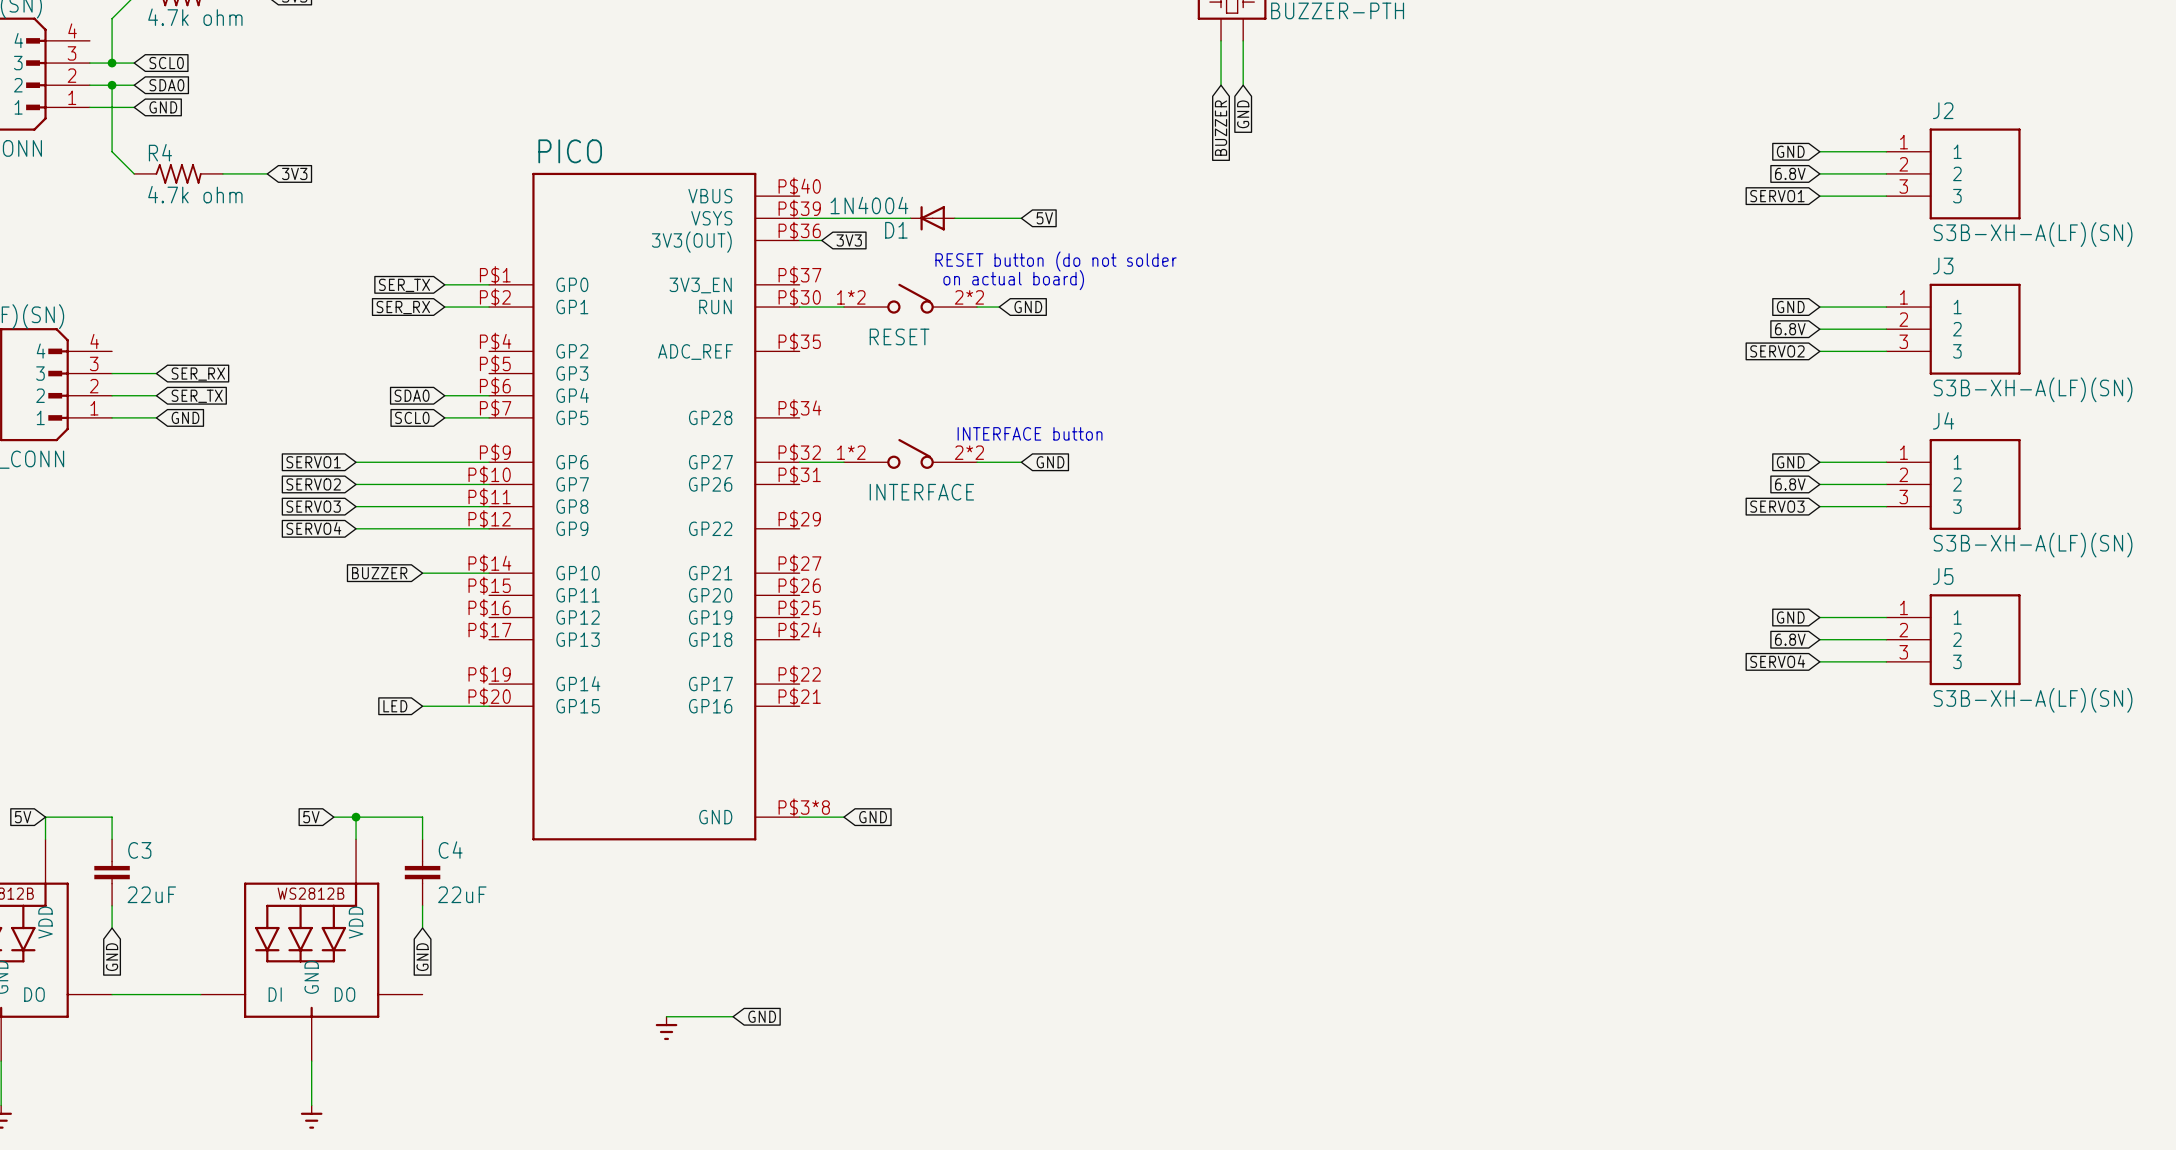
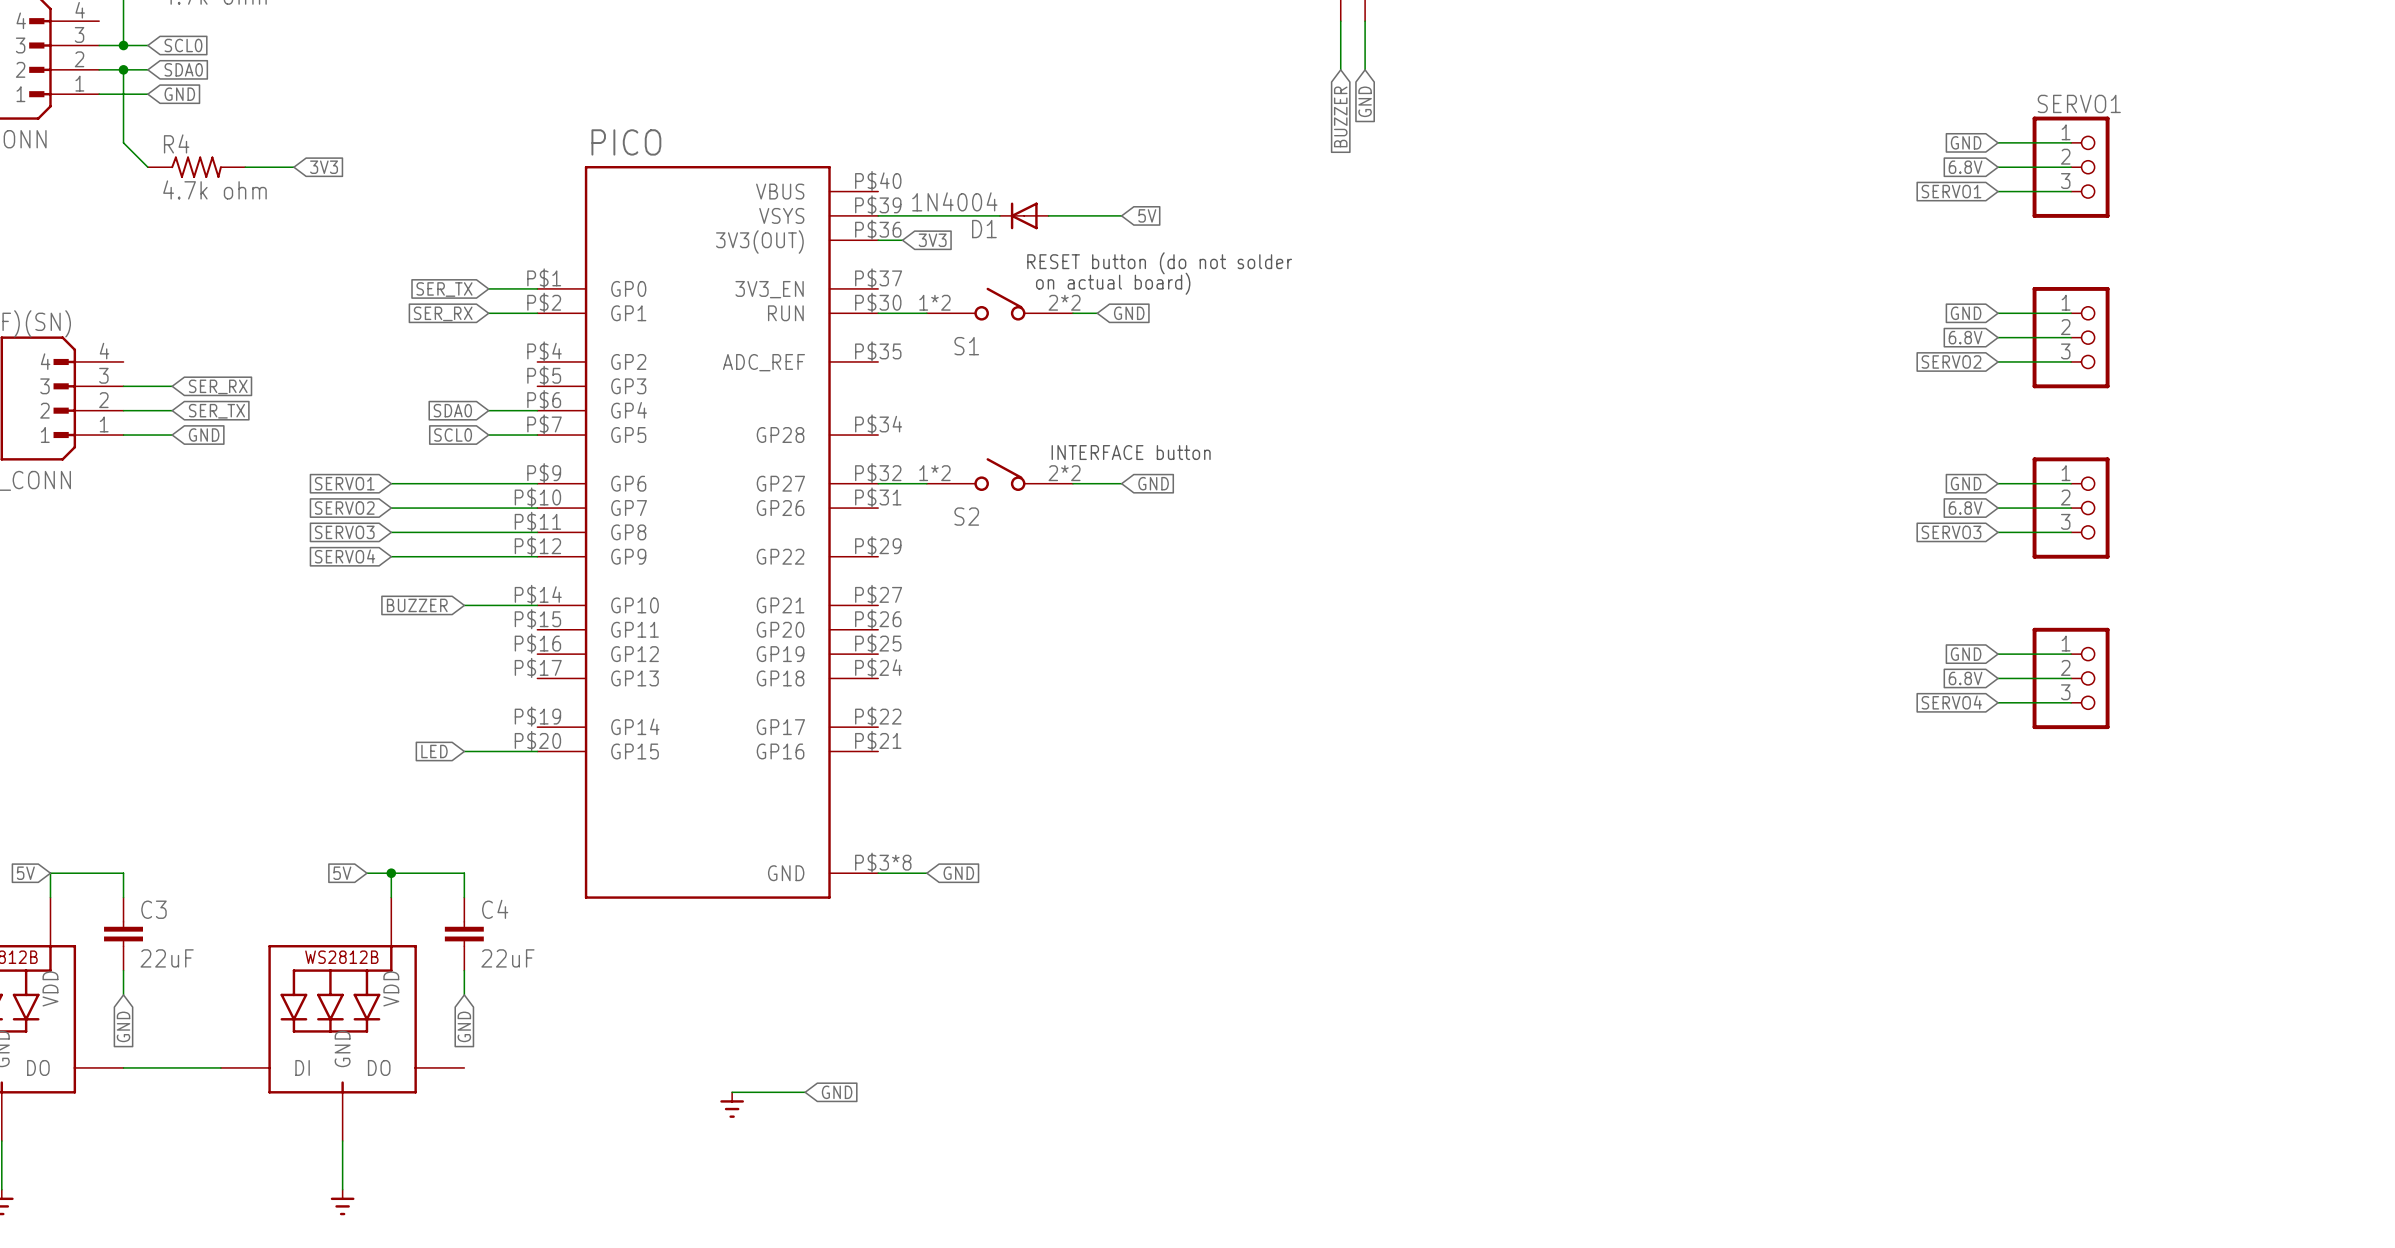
SERVO1: none -> (2071, 167)
J2: S3B-XH-A(LF)(SN) (1953, 173) -> none
part: none -> (2071, 337)
J3: S3B-XH-A(LF)(SN) (1953, 329) -> none
RESET name: RESET (899, 336) -> S1 (966, 346)
part: none -> (2071, 508)
J4: S3B-XH-A(LF)(SN) (1953, 484) -> none
INTERFACE name: INTERFACE (921, 492) -> S2 (966, 516)
part: none -> (2071, 678)
J5: S3B-XH-A(LF)(SN) (1953, 639) -> none

